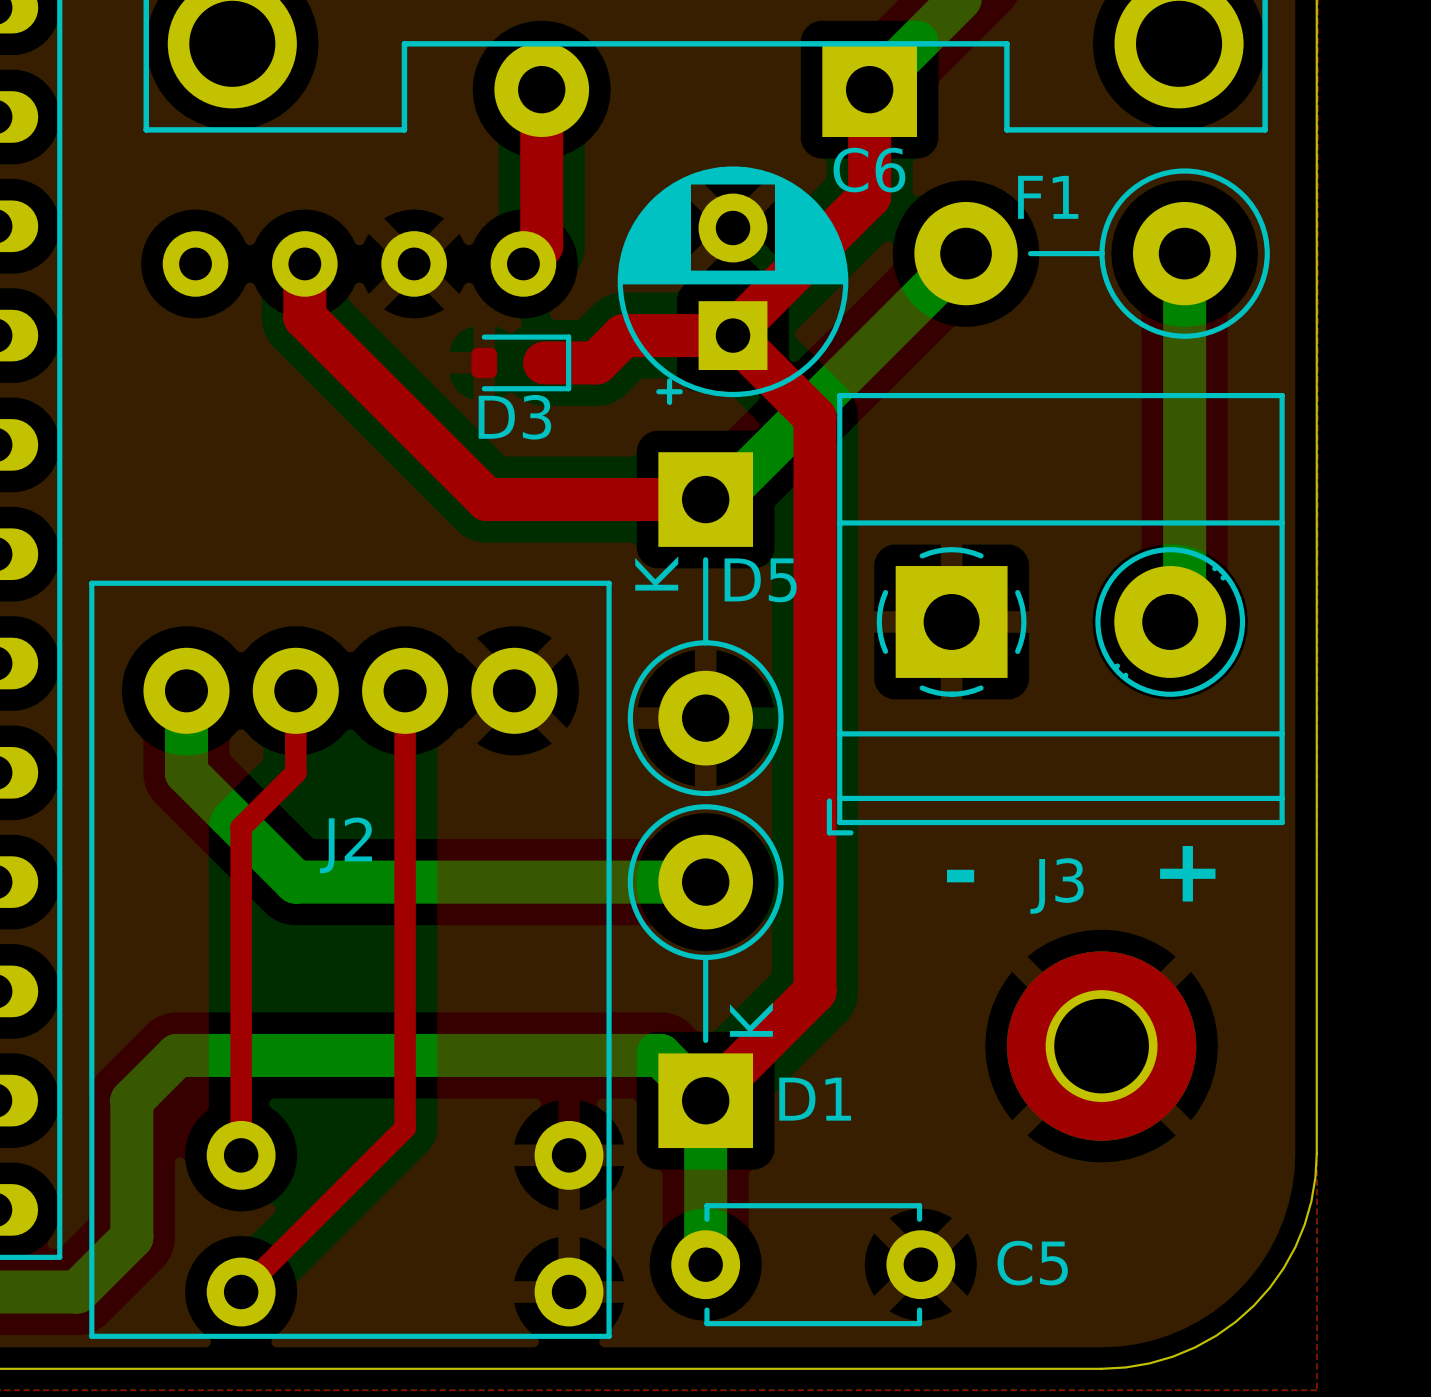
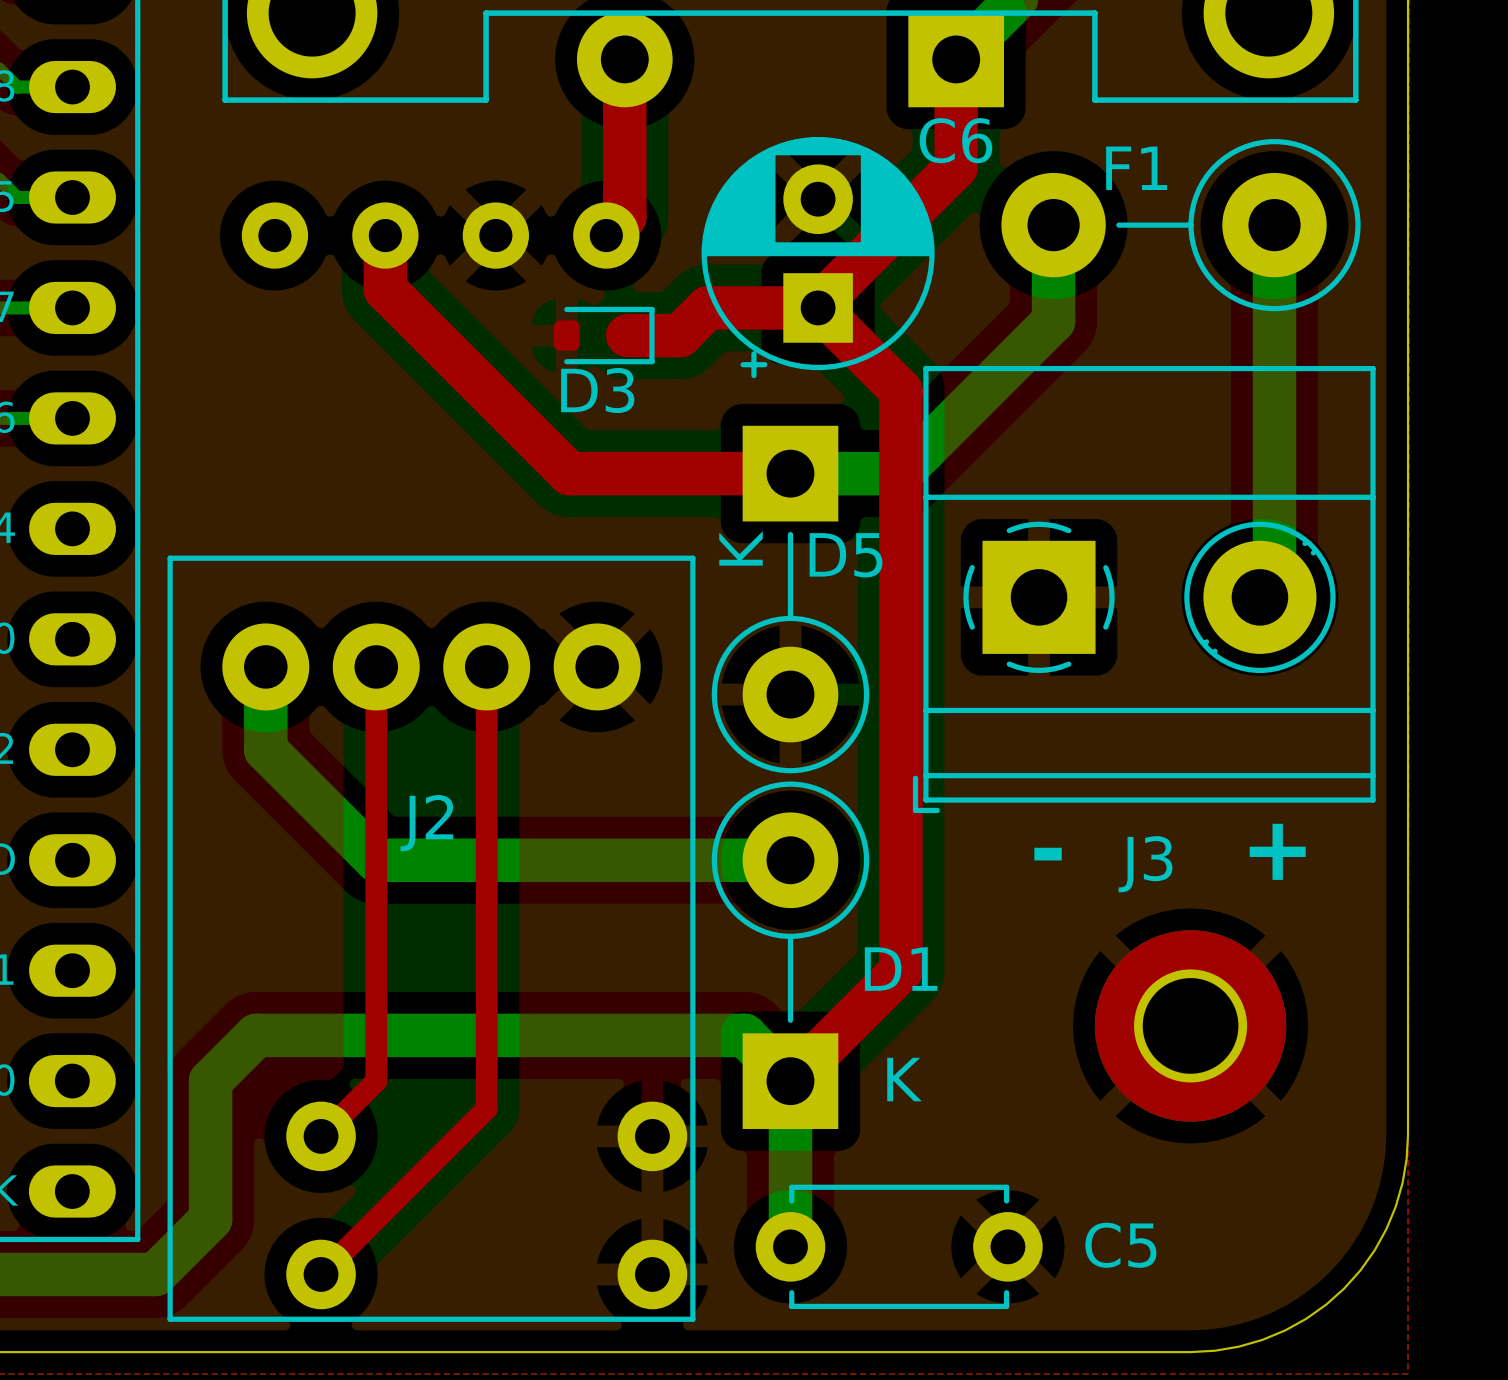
bottom track: (966, 253) (720, 499) -> (1053, 225) (1053, 321) (900, 473) (805, 473)
top track: (295, 772) (241, 827) (241, 1155) -> (376, 749) (376, 1081) (321, 1136)
D1 text rotation: 0° (751, 1019) -> 90° clockwise (904, 1079)
D1 text position: K (751, 1019) -> K (904, 1079)
D1 name position: D1 (815, 1099) -> D1 (901, 969)

